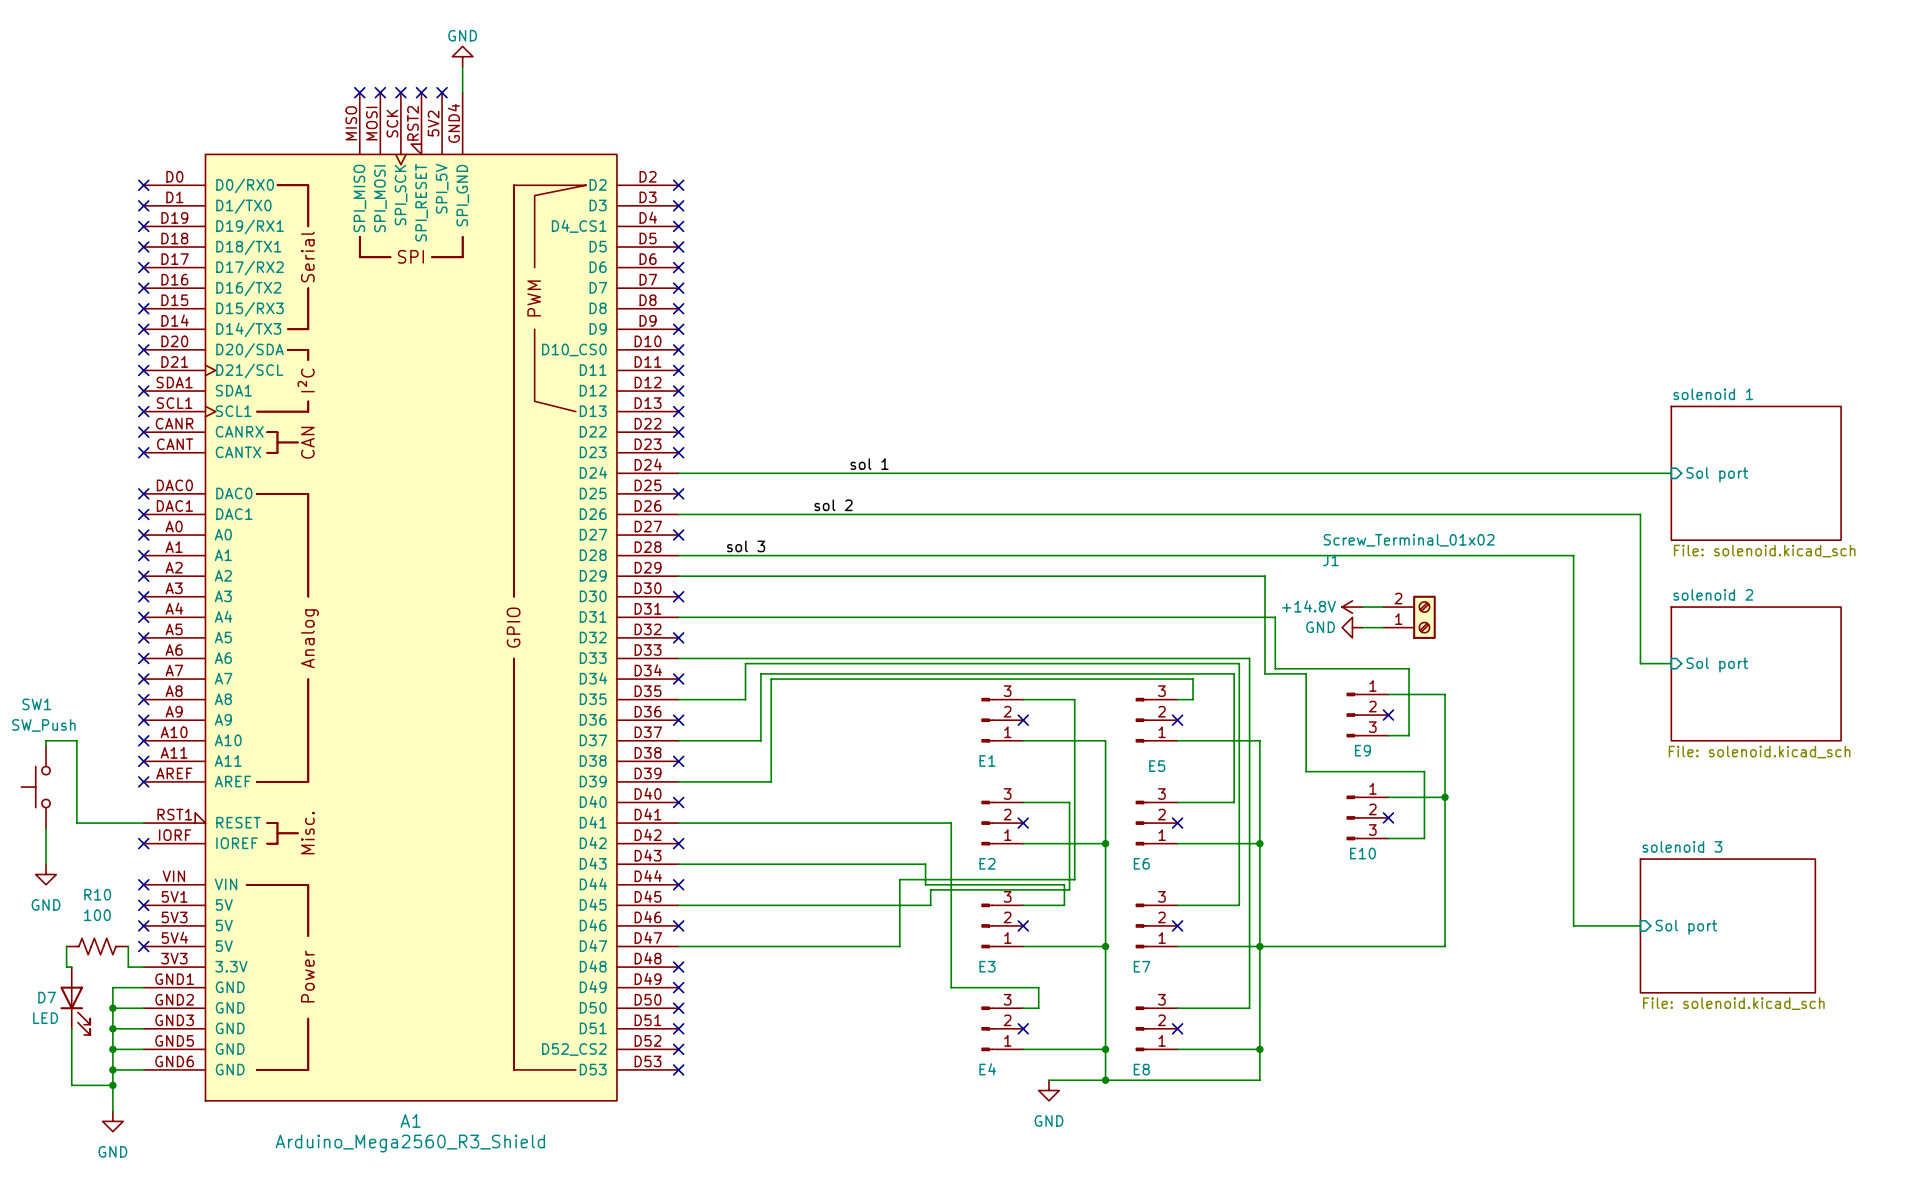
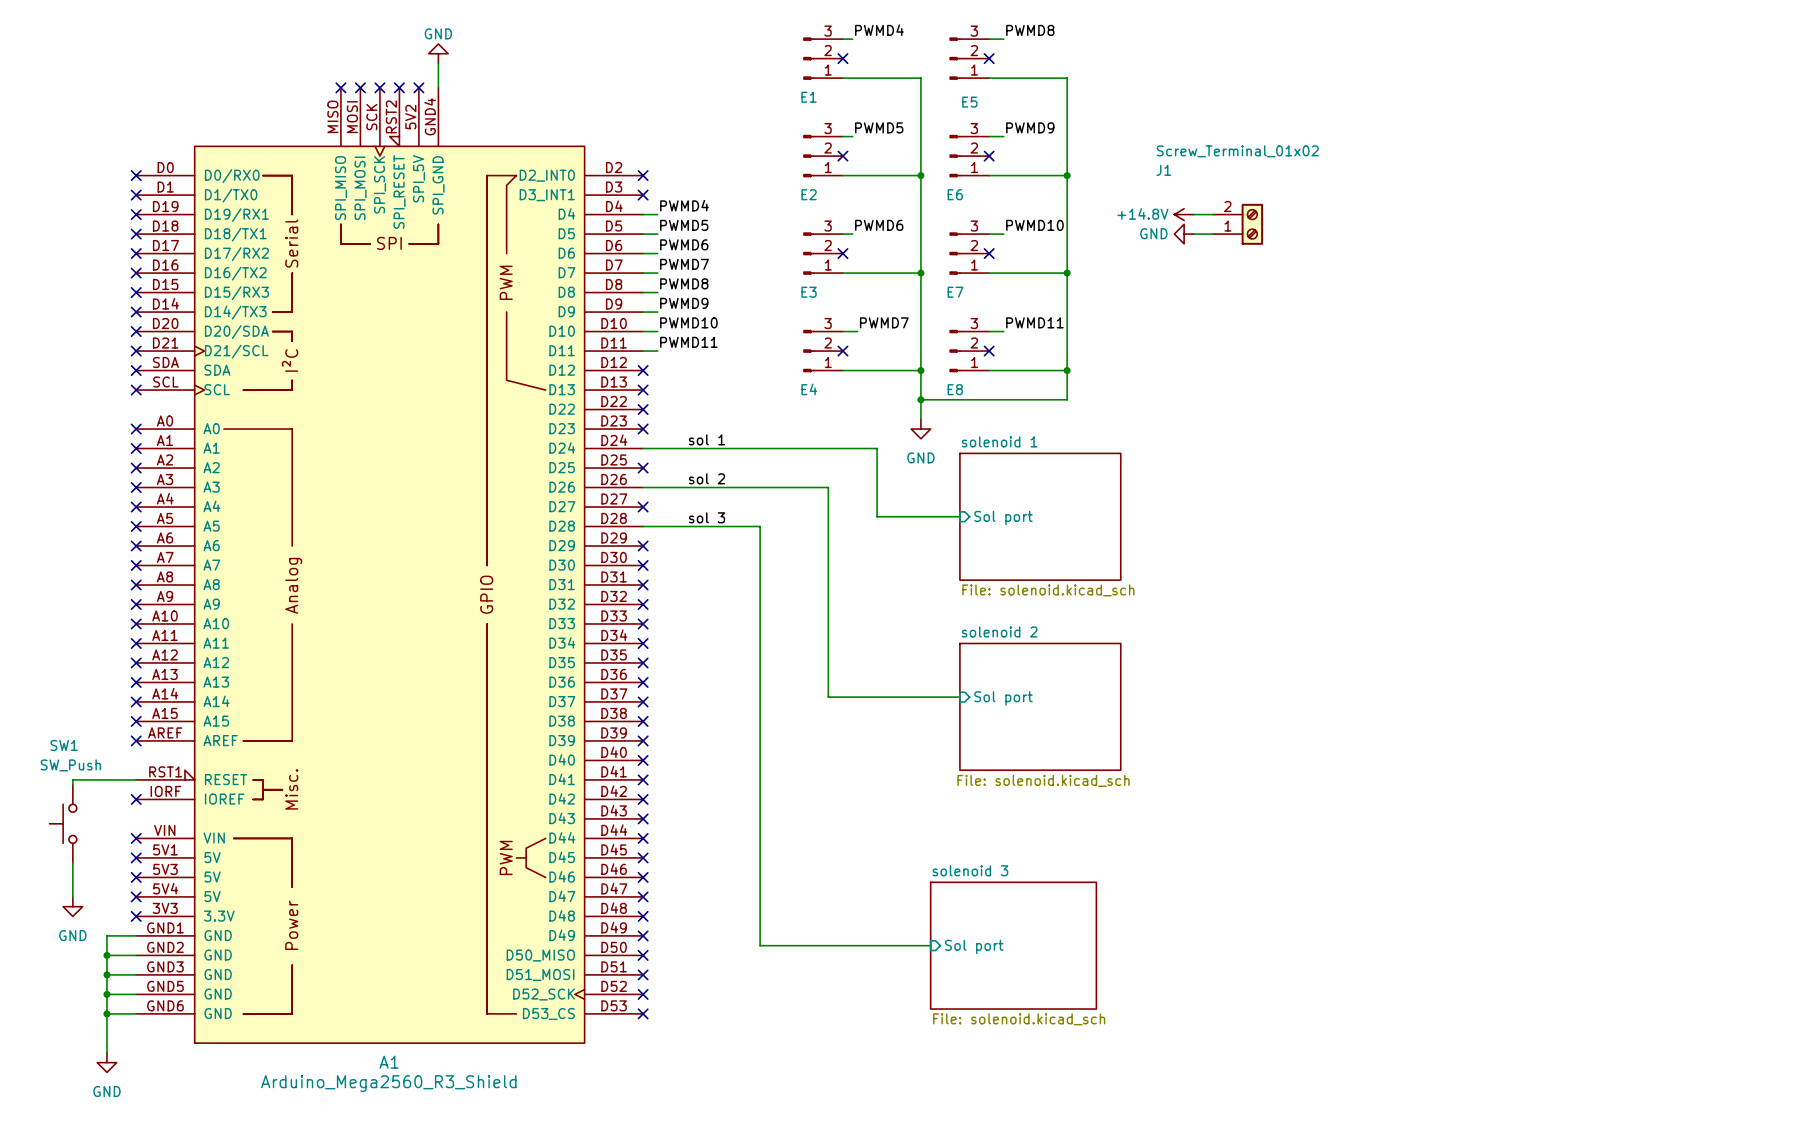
label: none -> PWMD4 (879, 30)
label: none -> PWMD8 (1030, 30)
wire: none -> (842, 39) (852, 39)
wire: none -> (989, 39) (1003, 39)
no-connect mark: none -> (842, 58)
no-connect mark: none -> (989, 58)
wire: none -> (842, 78) (920, 78) (920, 419)
wire: none -> (989, 78) (1067, 78) (1067, 399) (920, 399)
A1 symbol: [143, 92, 679, 1101] -> [136, 87, 644, 1044]
label: none -> PWMD5 (879, 127)
label: none -> PWMD9 (1030, 127)
wire: none -> (842, 136) (852, 136)
wire: none -> (989, 136) (1003, 136)
no-connect mark: none -> (842, 156)
no-connect mark: none -> (989, 156)
wire: none -> (842, 175) (920, 175)
junction: none -> (920, 175)
wire: none -> (989, 175) (1067, 175)
junction: none -> (1067, 175)
label: none -> PWMD4 (684, 205)
wire: none -> (643, 214) (657, 214)
no-connect mark: (678, 226) -> none
power symbol: none -> +14.8V (1184, 214)
wire: none -> (1193, 214) (1213, 214)
label: none -> PWMD5 (684, 225)
label: none -> PWMD6 (879, 225)
label: none -> PWMD10 (1034, 225)
wire: none -> (643, 234) (657, 234)
no-connect mark: (678, 247) -> none
wire: none -> (842, 234) (852, 234)
wire: none -> (989, 234) (1003, 234)
power symbol: none -> GND (1184, 234)
wire: none -> (1193, 234) (1213, 234)
label: none -> PWMD6 (684, 244)
wire: none -> (643, 253) (657, 253)
no-connect mark: (678, 267) -> none
no-connect mark: none -> (842, 253)
no-connect mark: none -> (989, 253)
label: none -> PWMD7 (684, 264)
wire: none -> (643, 273) (657, 273)
no-connect mark: (678, 288) -> none
wire: none -> (842, 273) (920, 273)
junction: none -> (920, 273)
wire: none -> (989, 273) (1067, 273)
junction: none -> (1067, 273)
label: none -> PWMD8 (684, 283)
wire: none -> (643, 292) (657, 292)
no-connect mark: (678, 308) -> none
label: none -> PWMD9 (684, 303)
wire: none -> (643, 312) (657, 312)
no-connect mark: (678, 329) -> none
label: none -> PWMD10 (688, 322)
label: none -> PWMD7 (884, 322)
label: none -> PWMD11 (1034, 322)
wire: none -> (643, 331) (657, 331)
no-connect mark: (678, 349) -> none
wire: none -> (842, 331) (857, 331)
wire: none -> (989, 331) (1003, 331)
label: none -> PWMD11 (688, 342)
wire: none -> (643, 351) (657, 351)
no-connect mark: (678, 370) -> none
no-connect mark: none -> (842, 351)
no-connect mark: none -> (989, 351)
wire: none -> (842, 370) (920, 370)
junction: none -> (920, 370)
wire: none -> (989, 370) (1067, 370)
junction: none -> (1067, 370)
junction: none -> (920, 399)
no-connect mark position: (143, 432) -> (136, 448)
power symbol: none -> GND (920, 429)
label position: sol 1 (869, 464) -> sol 1 (707, 439)
wire: (925, 473) (1671, 473) -> (877, 448) (877, 516) (959, 516)
sheet solenoid 1 position: (1756, 473) -> (1040, 516)
sheet pin: Sol port (1717, 474) -> none
label position: sol 2 (833, 505) -> sol 2 (707, 478)
wire: (874, 514) (1640, 514) (1640, 663) (1671, 663) -> (828, 487) (828, 697) (959, 697)
sheet pin: none -> Sol port (1003, 518)
wire: (802, 555) (1573, 555) (1573, 925) (1640, 925) -> (760, 526) (760, 945) (930, 945)
wire: (678, 576) (1265, 576) (1265, 673) (1306, 673) (1306, 771) (1424, 771) (1424, 838) (1388, 838) -> none
no-connect mark: none -> (643, 546)
power symbol: +14.8V (1352, 607) -> none
wire: (1362, 607) (1383, 607) -> none
wire: (678, 617) (1275, 617) (1275, 668) (1409, 668) (1409, 735) (1388, 735) -> none
no-connect mark: none -> (643, 584)
J1 position: (1409, 617) -> (1238, 224)
power symbol: GND (1352, 627) -> none
wire: (1362, 627) (1383, 627) -> none
wire: (678, 658) (1249, 658) (1249, 1008) (1177, 1008) -> none
no-connect mark: none -> (643, 623)
sheet pin: Sol port (1717, 664) -> none
sheet solenoid 2 position: (1756, 673) -> (1040, 706)
wire: (1388, 694) (1445, 694) (1445, 946) (1177, 946) -> none
wire: (678, 699) (745, 699) (745, 663) (1239, 663) (1239, 905) (1177, 905) -> none
no-connect mark: none -> (643, 662)
wire: (1023, 699) (1074, 699) (1074, 879) (899, 879) (899, 946) (678, 946) -> none
wire: (1177, 699) (1193, 699) (1193, 679) (771, 679) (771, 781) (678, 781) -> none
E9: (1367, 715) -> none
no-connect mark: (1388, 715) -> none
E1 position: (1002, 720) -> (823, 58)
no-connect mark: (1023, 720) -> none
E5 position: (1156, 720) -> (969, 58)
no-connect mark: (1177, 720) -> none
sheet pin: none -> Sol port (1003, 698)
wire: (678, 740) (760, 740) (760, 673) (1234, 673) (1234, 802) (1177, 802) -> none
no-connect mark: none -> (643, 701)
wire: (1023, 740) (1105, 740) (1105, 1080) -> none
wire: (1177, 740) (1259, 740) (1259, 1080) (1048, 1080) -> none
wire: (46, 745) (46, 740) (76, 740) (76, 823) -> (72, 784) (72, 779)
no-connect mark: none -> (643, 740)
SW1 position: (35, 787) -> (63, 823)
wire: (1388, 797) (1445, 797) -> none
junction: (1445, 797) -> none
wire: (1023, 802) (1069, 802) (1069, 889) (930, 889) (930, 905) (678, 905) -> none
E10: (1367, 817) -> none
no-connect mark: (1388, 817) -> none
wire: (678, 823) (951, 823) (951, 987) (1038, 987) (1038, 1008) (1023, 1008) -> none
no-connect mark: none -> (643, 779)
E2 position: (1002, 823) -> (823, 156)
no-connect mark: (1023, 823) -> none
E6 position: (1156, 823) -> (969, 156)
no-connect mark: (1177, 823) -> none
wire: (46, 828) (46, 864) -> (72, 862) (72, 896)
wire: (1023, 843) (1105, 843) -> none
junction: (1105, 843) -> none
wire: (1177, 843) (1259, 843) -> none
junction: (1259, 843) -> none
wire: (678, 864) (925, 864) (925, 884) (1064, 884) (1064, 905) (1023, 905) -> none
no-connect mark: none -> (643, 818)
power symbol position: GND (46, 874) -> GND (72, 906)
no-connect mark: none -> (643, 857)
E3 position: (1002, 925) -> (823, 253)
no-connect mark: (1023, 925) -> none
E7 position: (1156, 925) -> (969, 253)
no-connect mark: (1177, 925) -> none
sheet solenoid 3 position: (1727, 925) -> (1013, 945)
sheet pin: Sol port (1686, 927) -> none
wire: (66, 946) (66, 967) (71, 967) -> none
R10: 100 (97, 946) -> none
wire: (128, 946) (128, 967) (143, 967) -> none
no-connect mark: none -> (643, 896)
wire: (1023, 946) (1105, 946) -> none
junction: (1105, 946) -> none
junction: (1259, 946) -> none
no-connect mark: none -> (136, 916)
sheet pin: none -> Sol port (974, 946)
D7: LED (75, 1001) -> none
wire: (71, 1028) (71, 1085) (112, 1085) -> none
E4 position: (1002, 1028) -> (823, 351)
no-connect mark: (1023, 1028) -> none
E8 position: (1156, 1028) -> (969, 351)
no-connect mark: (1177, 1028) -> none
wire: (1023, 1049) (1105, 1049) -> none
junction: (1105, 1049) -> none
wire: (1177, 1049) (1259, 1049) -> none
junction: (1259, 1049) -> none
junction: (1105, 1080) -> none
junction: (112, 1085) -> none
power symbol: GND (1048, 1090) -> none

